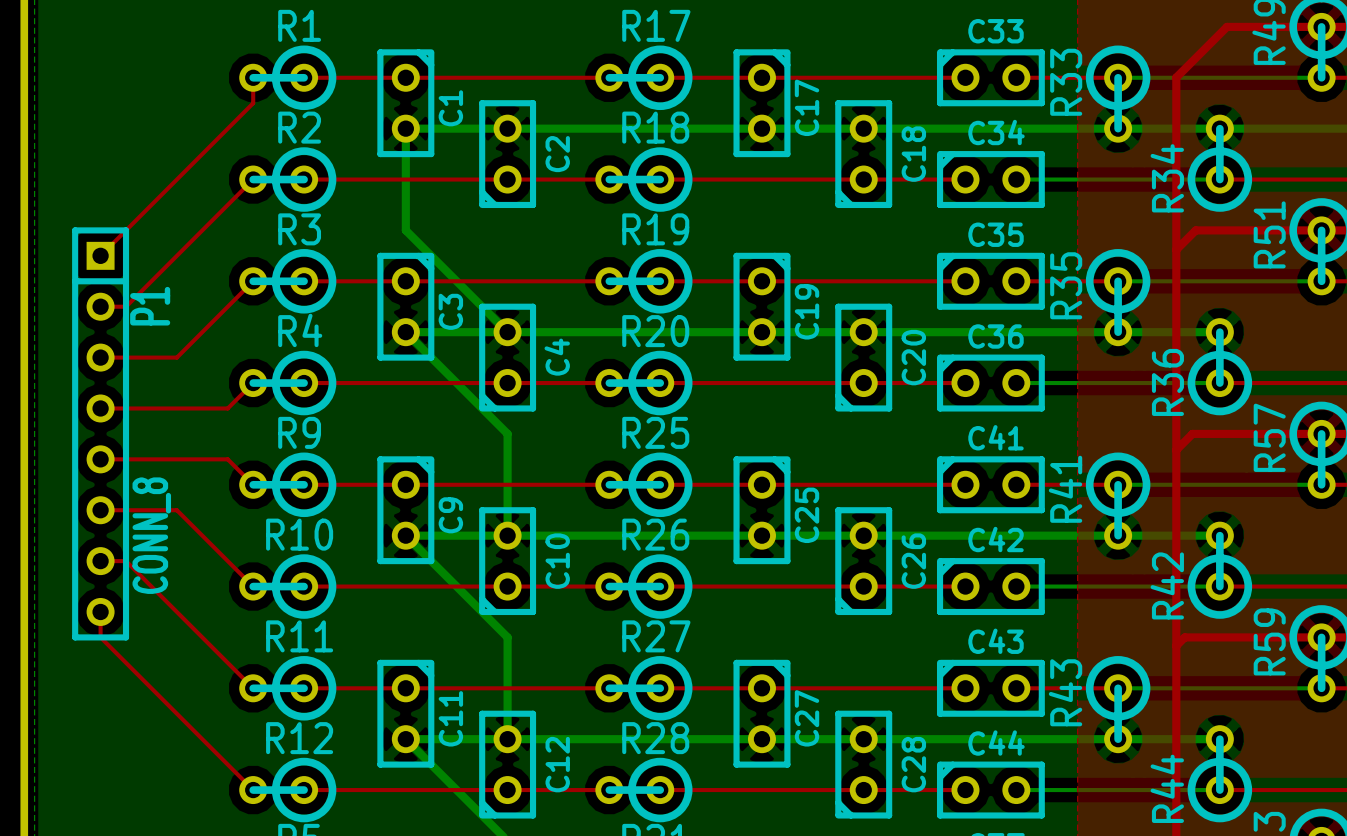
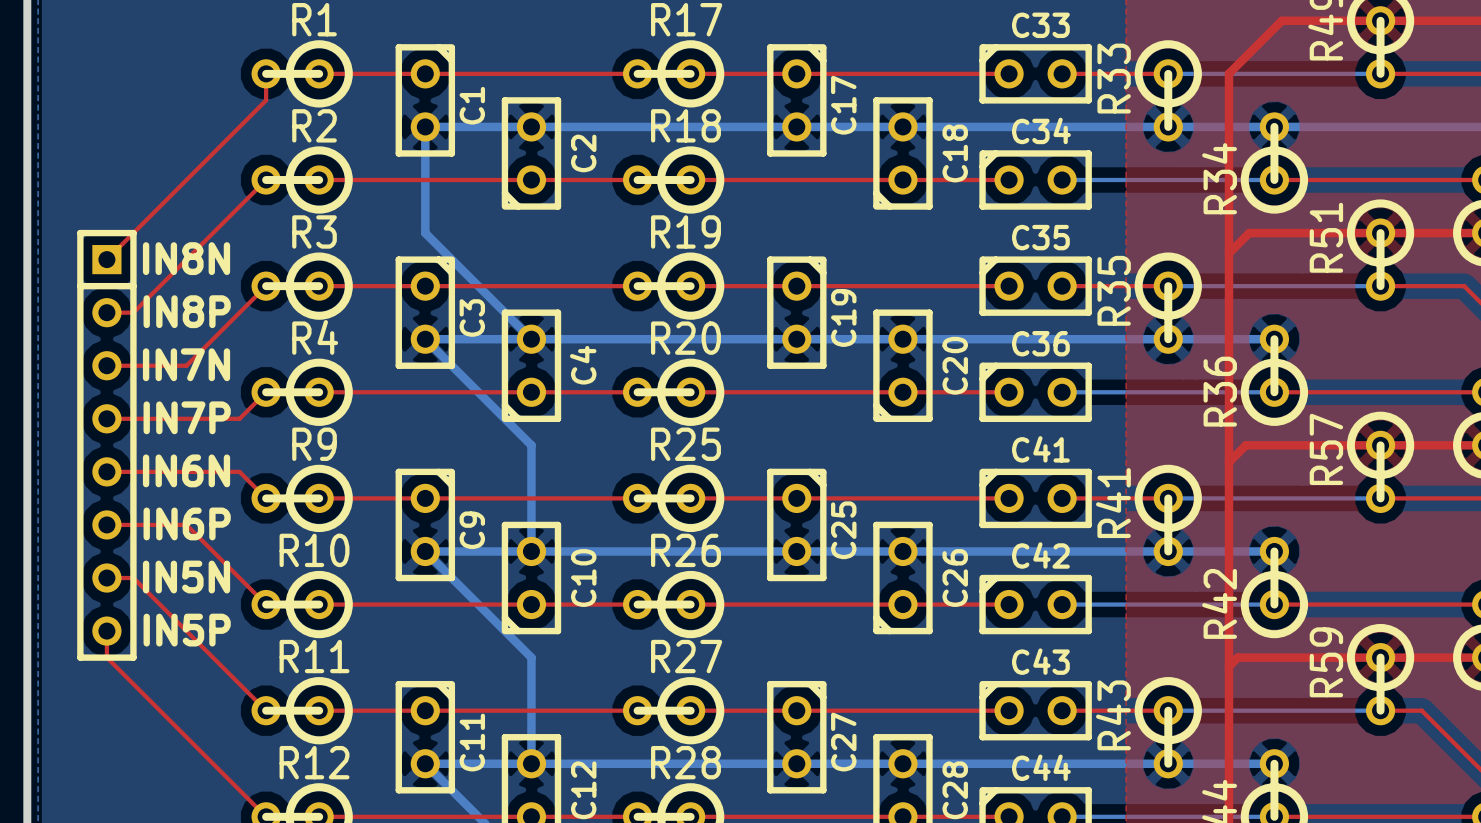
text: none -> IN8N (186, 258)
text: none -> IN8P (187, 311)
P1 name: P1 (150, 306) -> none
text: none -> IN7N (186, 364)
text: none -> IN7P (187, 417)
text: none -> IN6N (186, 470)
text: none -> IN6P (187, 523)
P1 value: CONN_8 (151, 535) -> none
text: none -> IN5N (186, 577)
text: none -> IN5P (187, 630)

